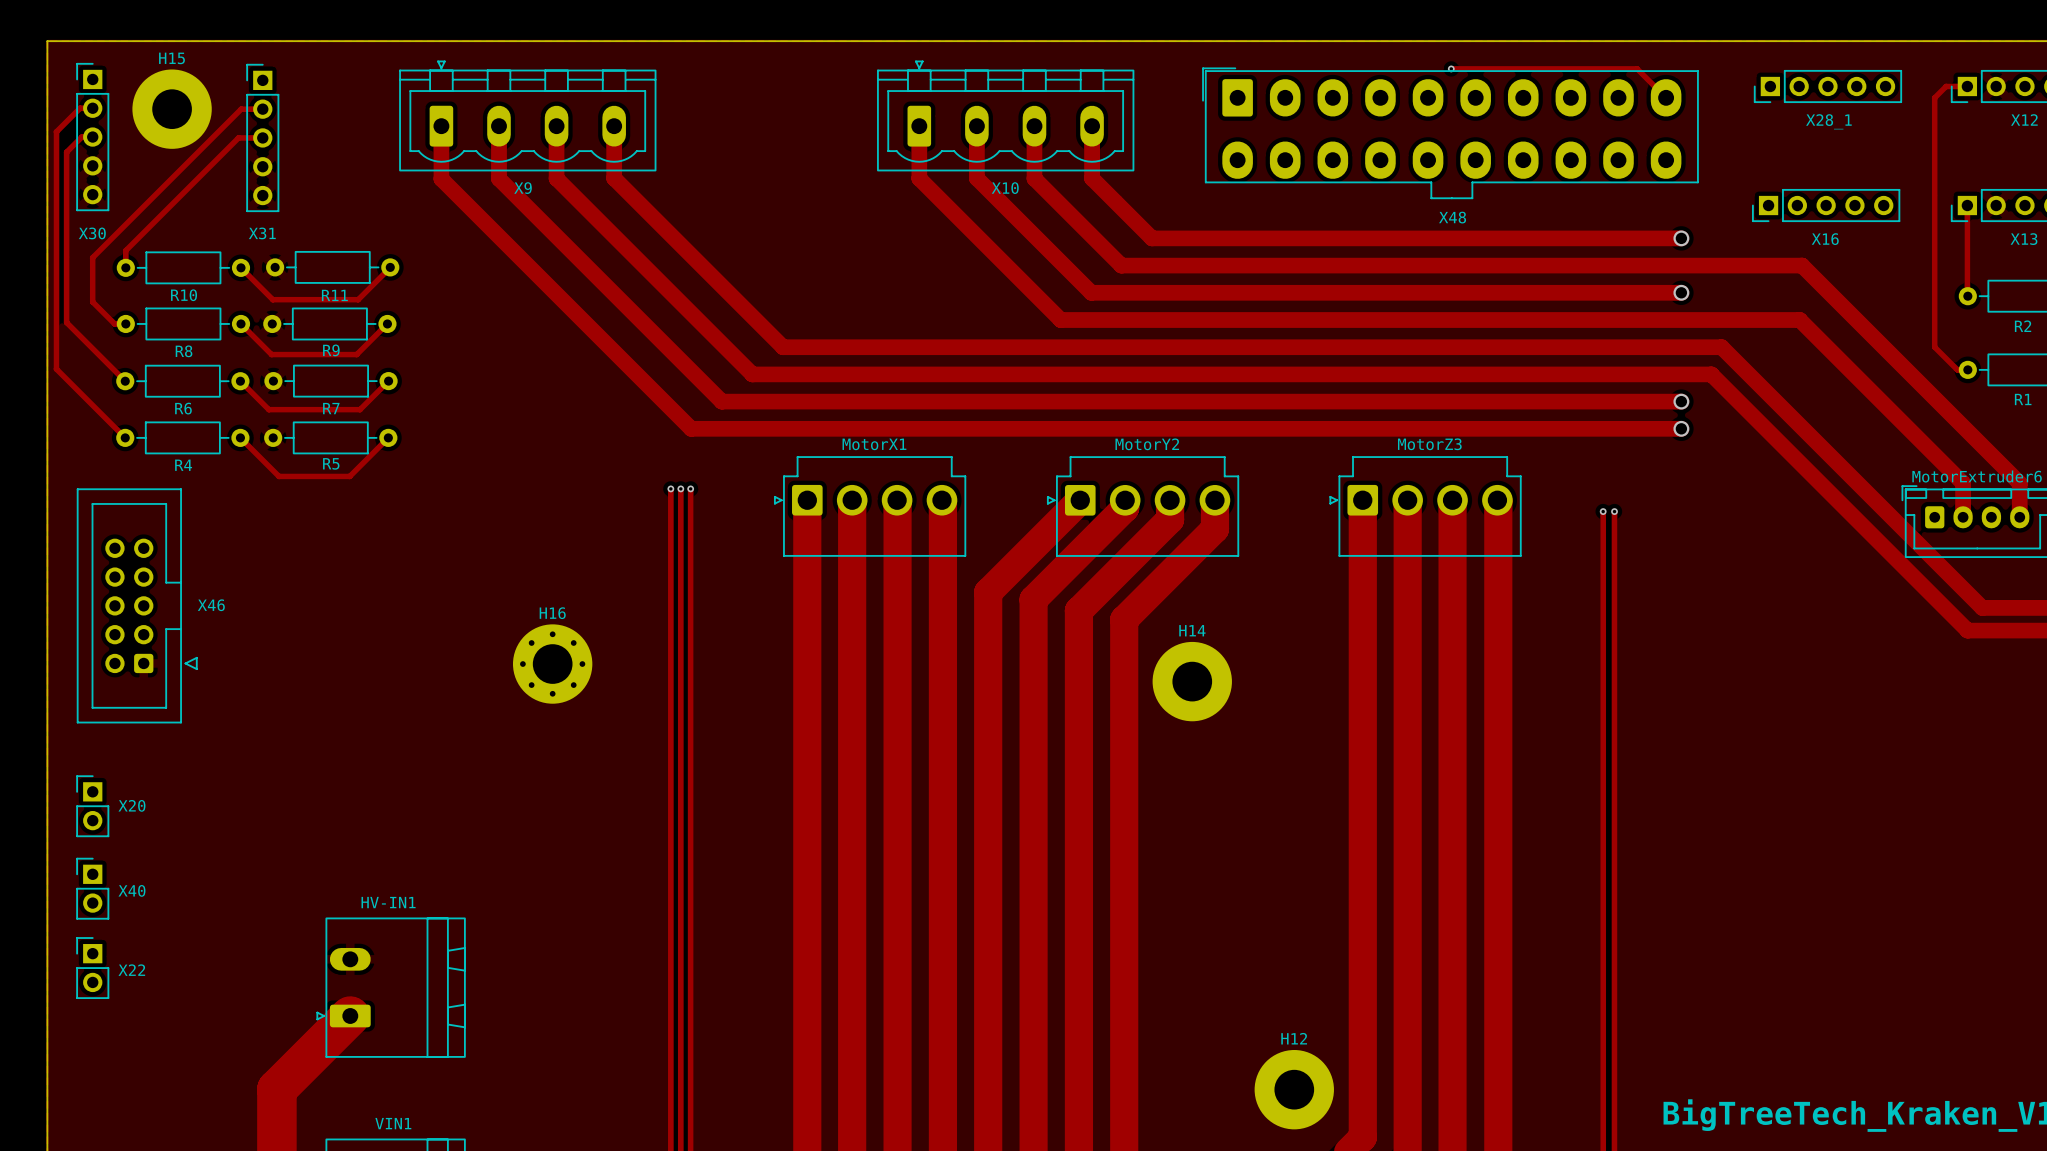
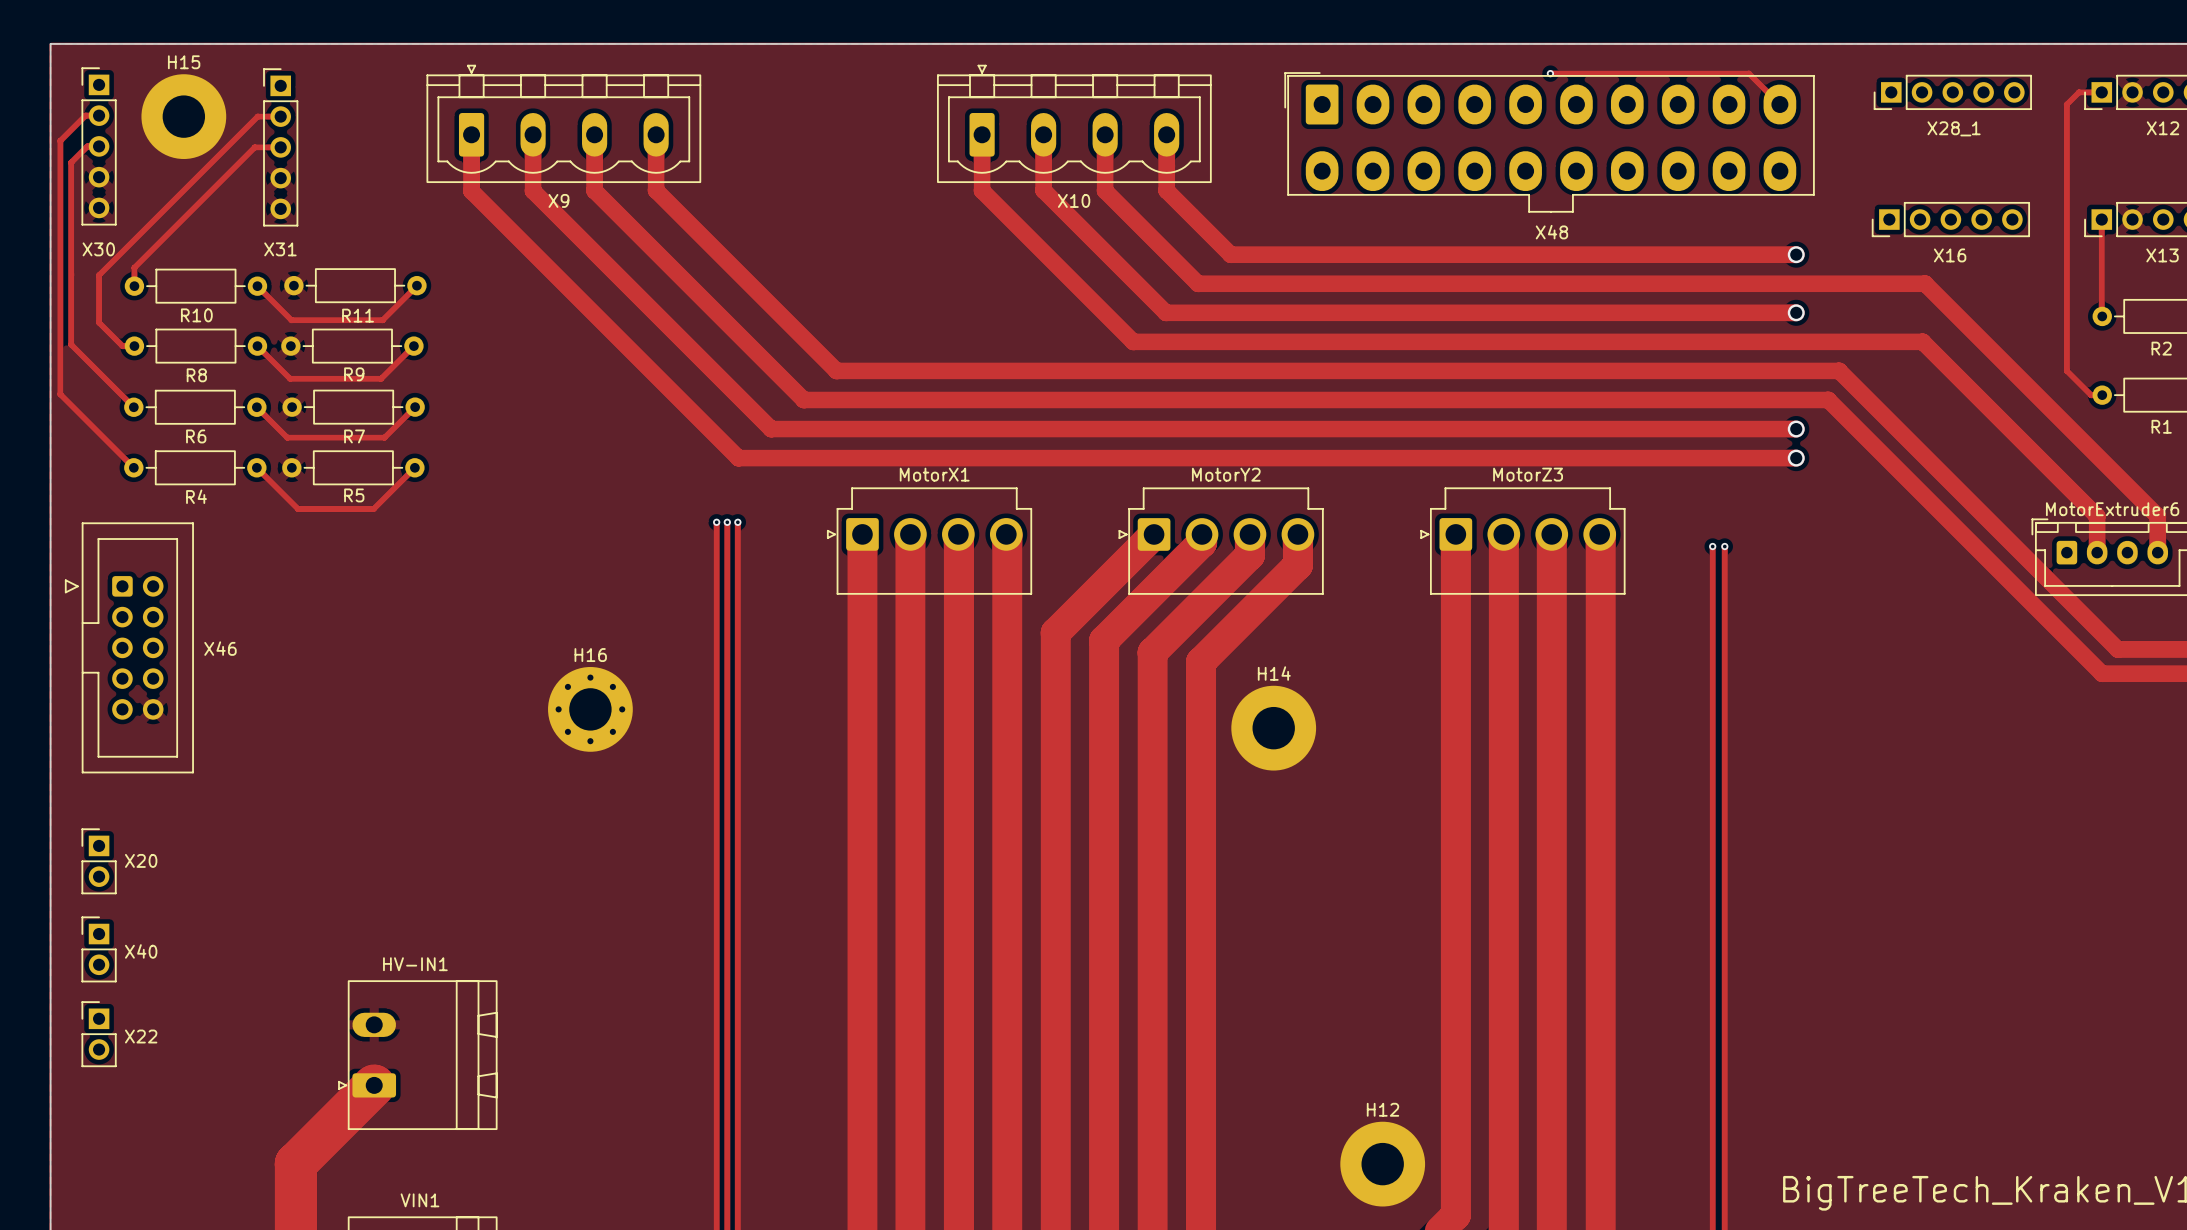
X46 rotation: 0° (137, 605) -> 180° (129, 647)

